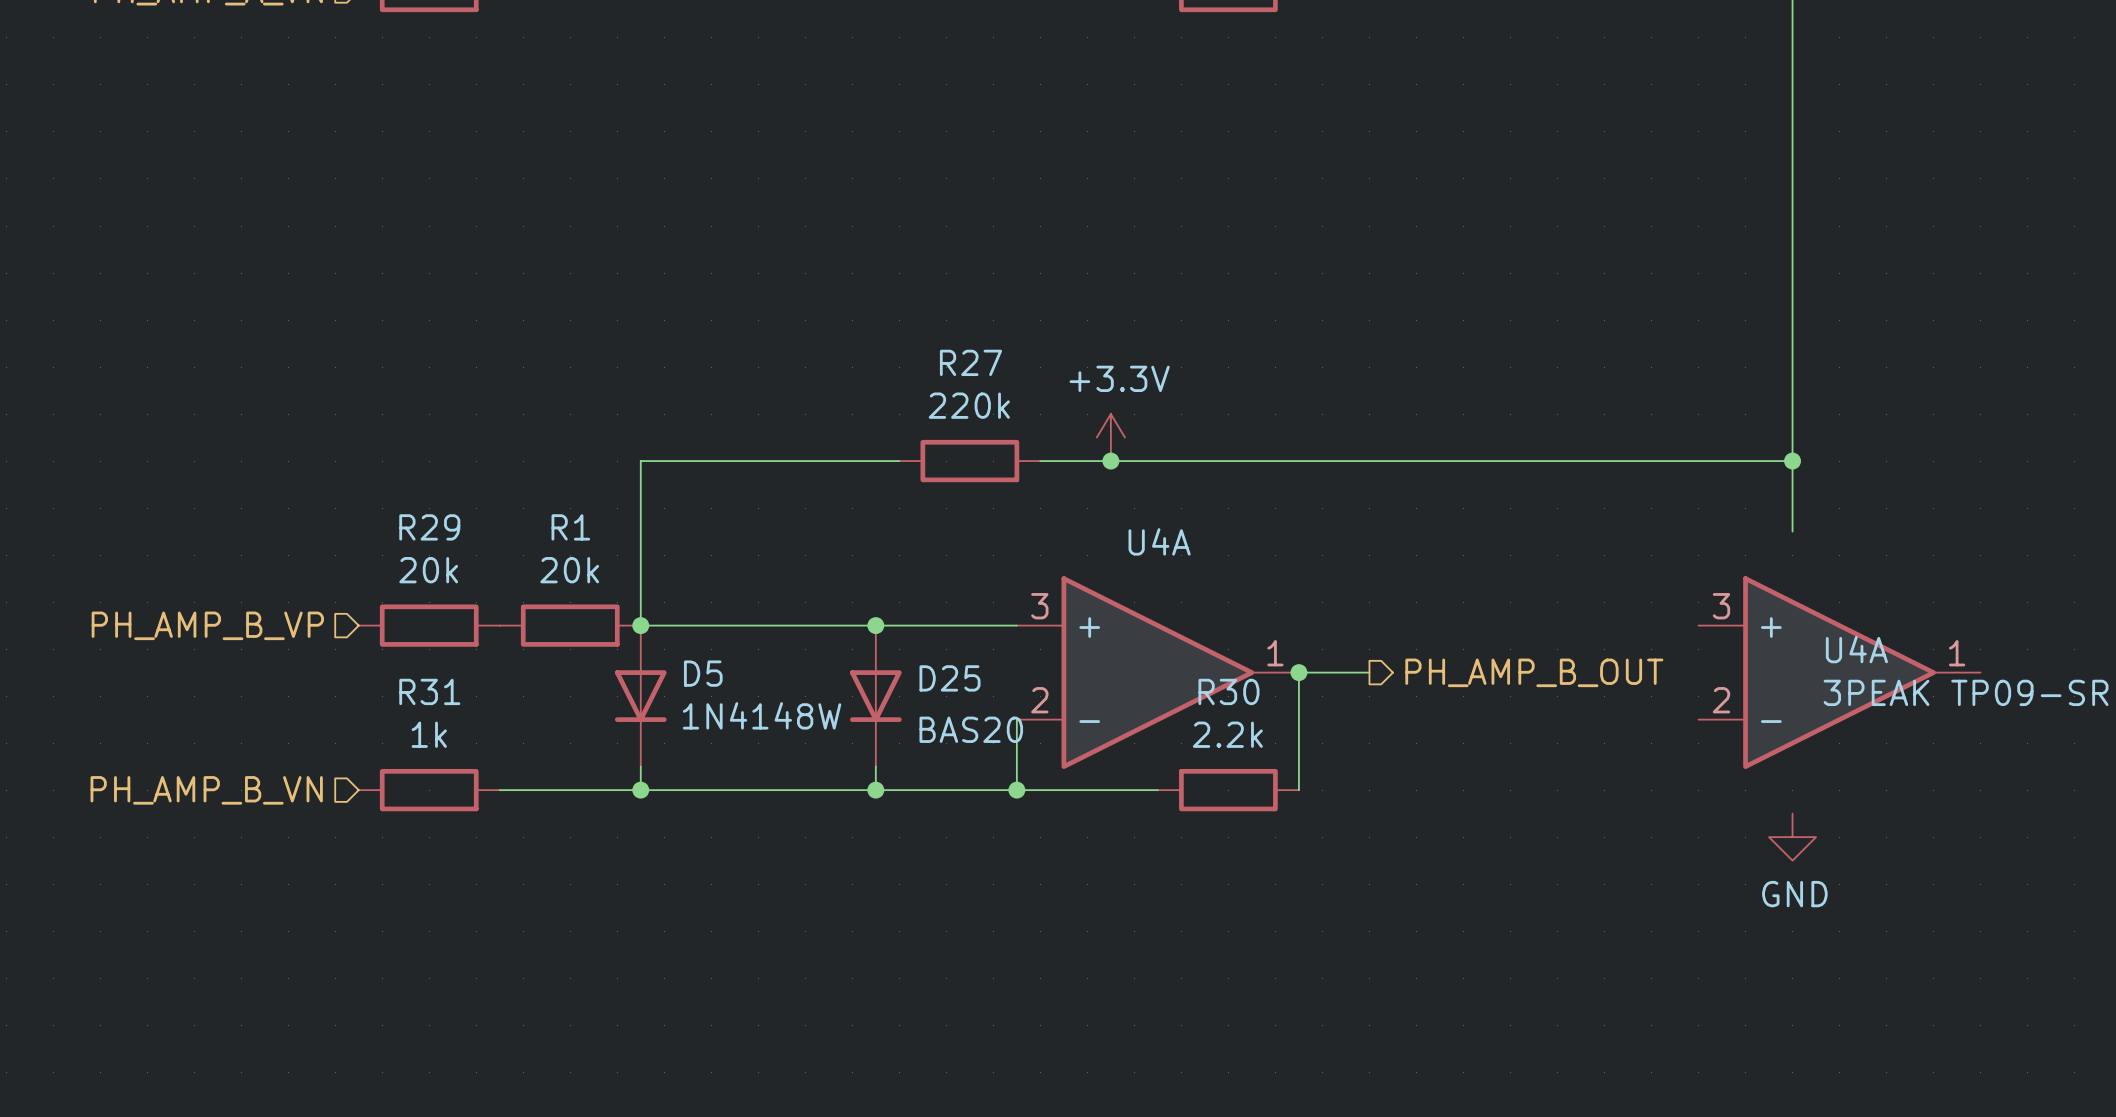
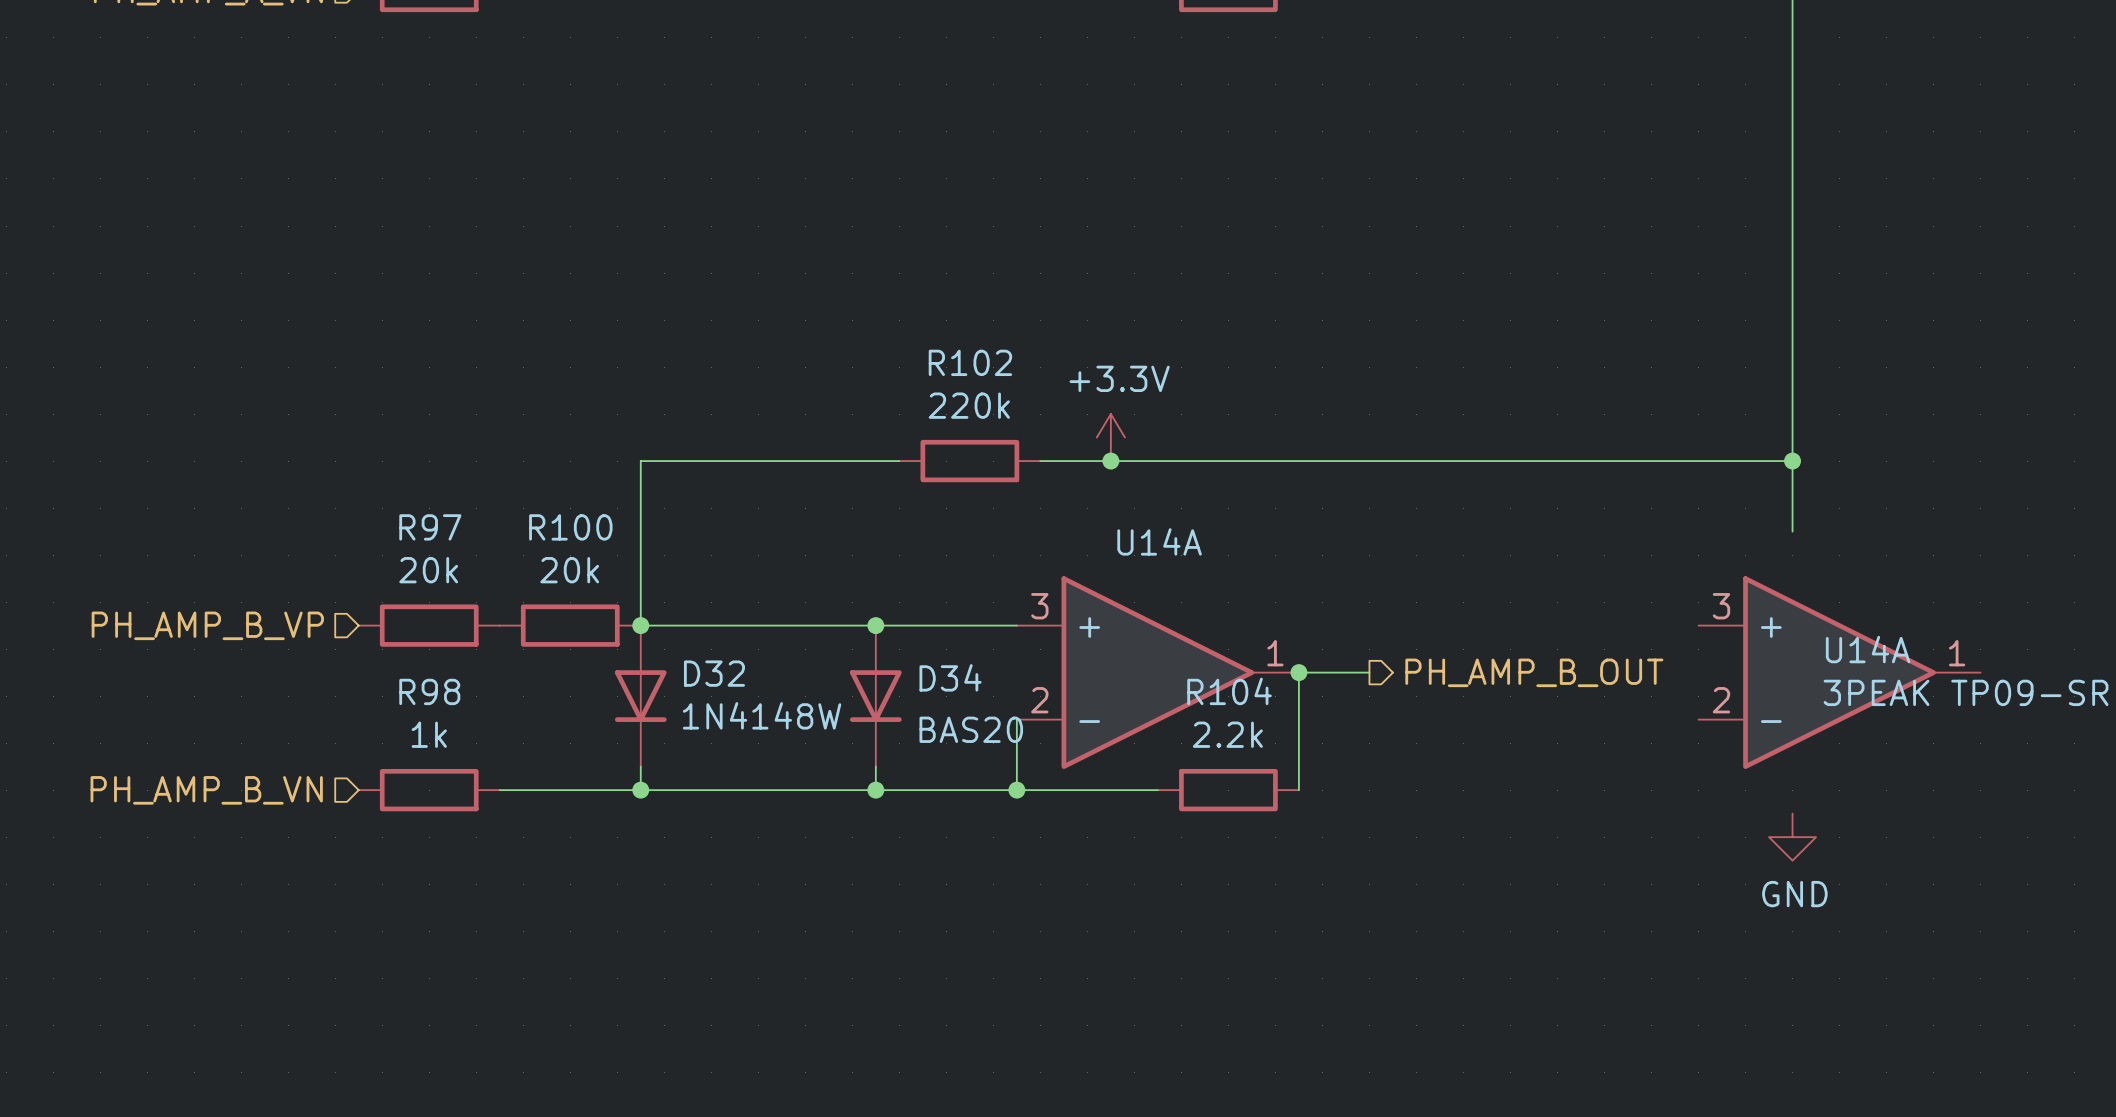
R27 name: R27 (970, 362) -> R102 (970, 362)
R29 name: R29 (429, 527) -> R97 (430, 527)
R1 name: R1 (570, 527) -> R100 (570, 527)
U4A name: U4A (1159, 541) -> U14A (1159, 541)
U4A name: U4A (1856, 649) -> U14A (1868, 649)
D5 name: D5 (703, 673) -> D32 (714, 673)
D25 name: D25 (950, 678) -> D34 (950, 677)
R31 name: R31 (429, 691) -> R98 (429, 691)
R30 name: R30 (1228, 691) -> R104 (1229, 691)

